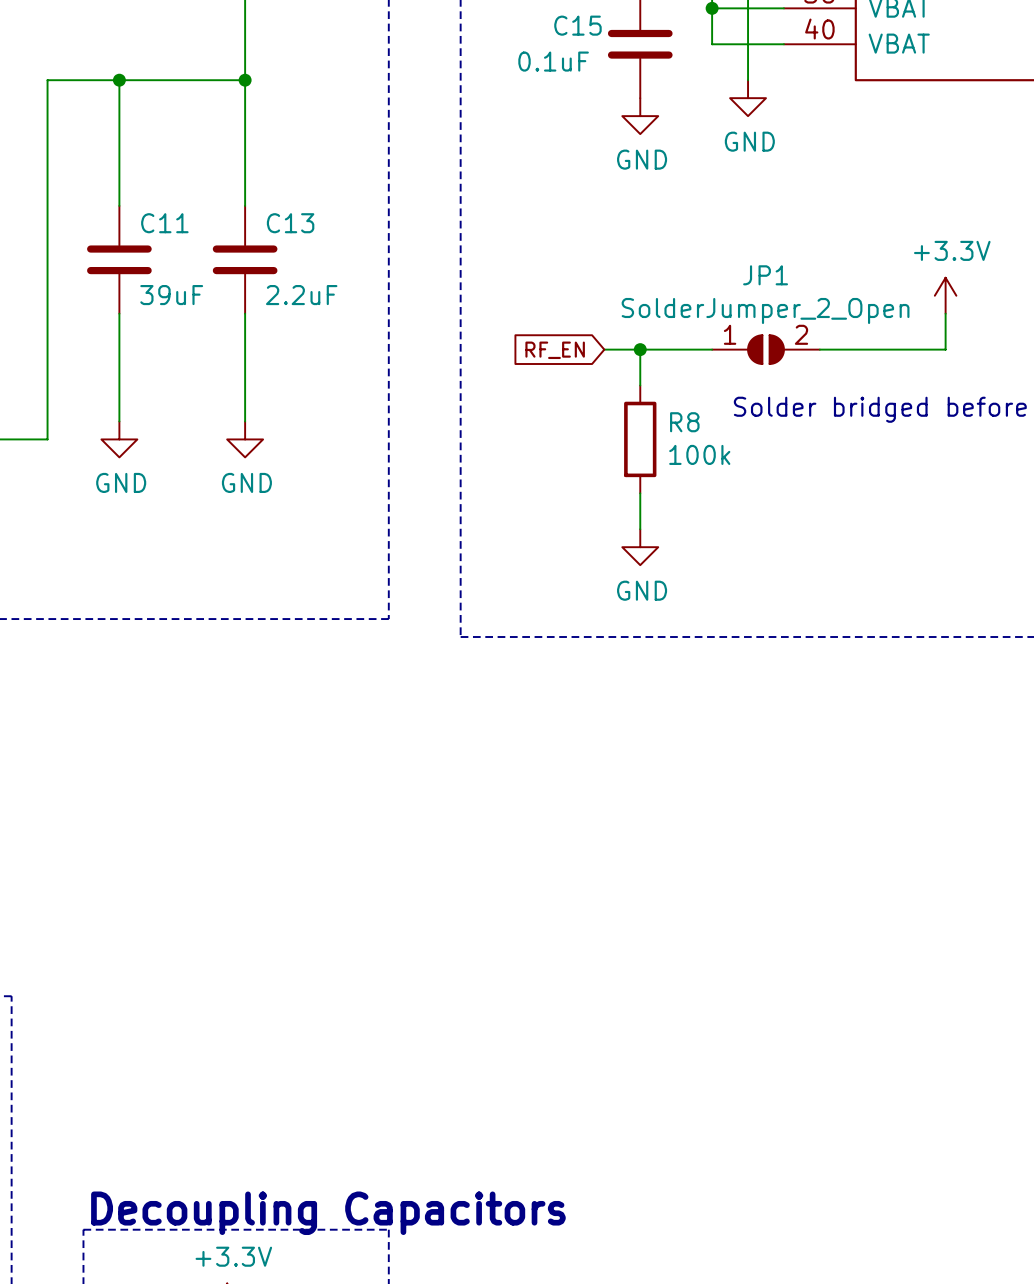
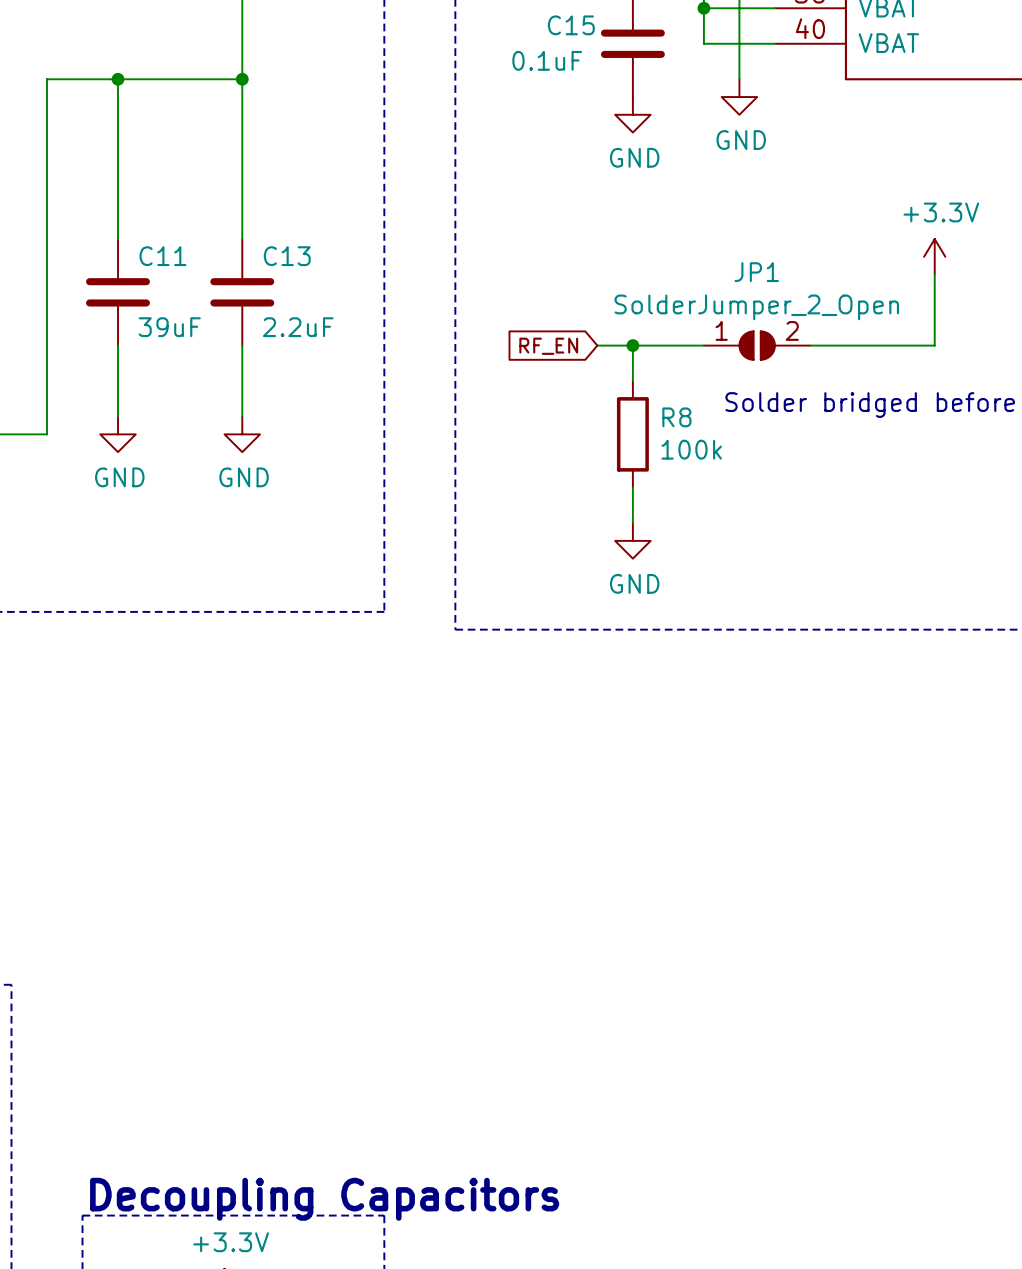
C11 position: (119, 259) -> (118, 292)
C13 position: (245, 259) -> (242, 292)
power symbol position: +3.3V (945, 295) -> +3.3V (934, 256)

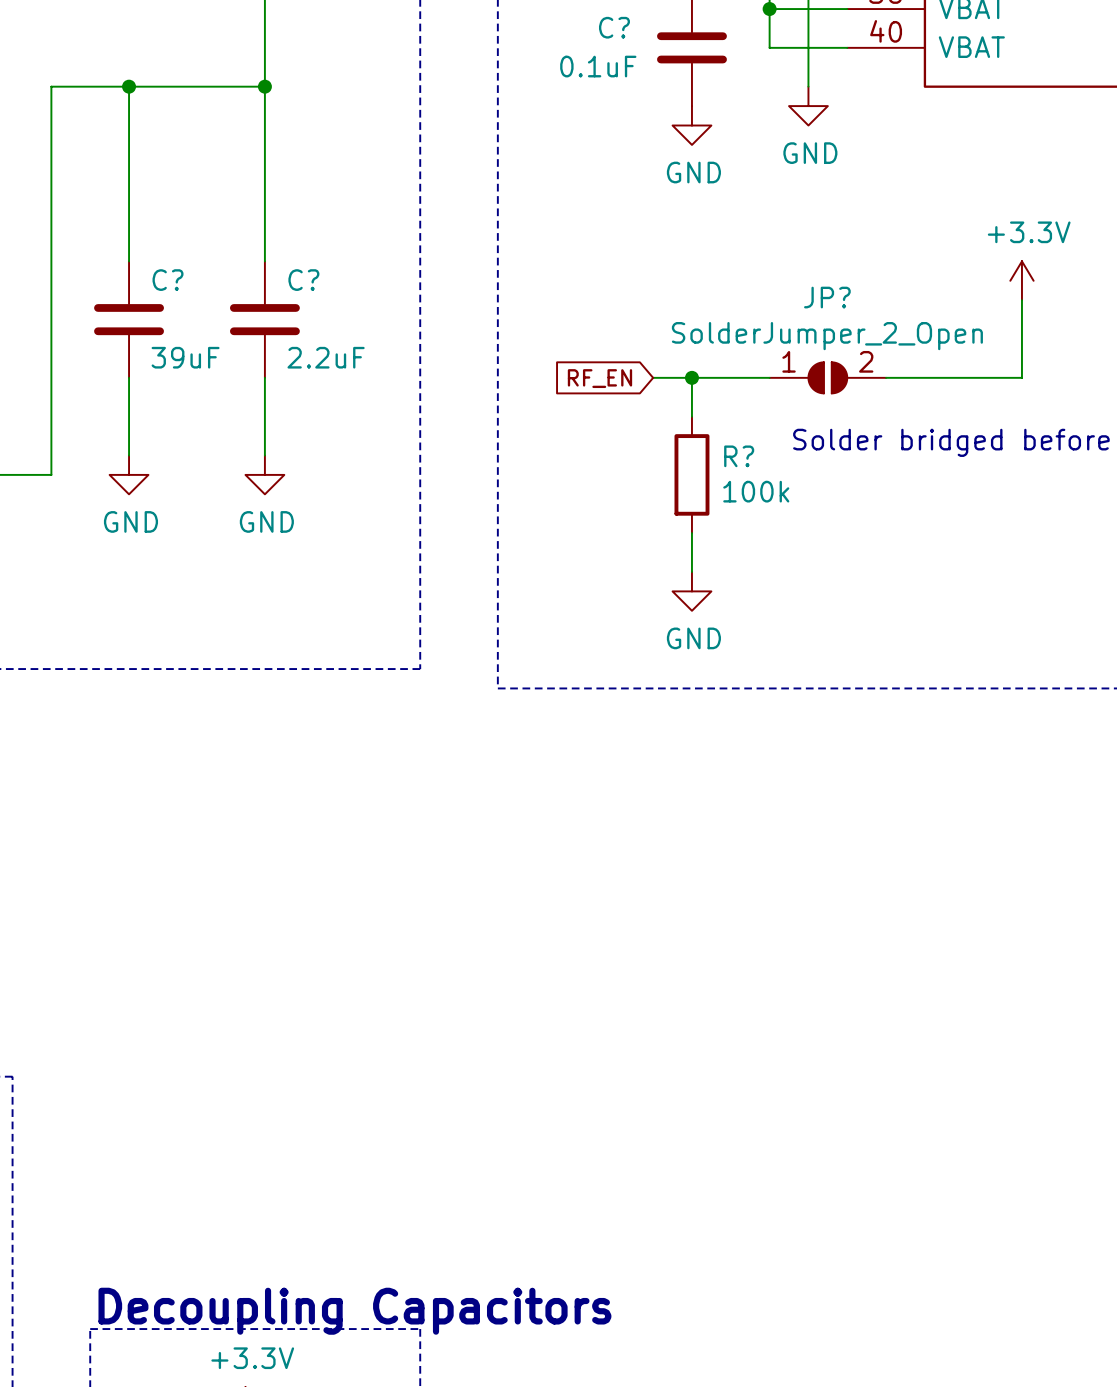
C15 name: C15 (571, 25) -> C? (614, 27)
C11 name: C11 (162, 256) -> C? (168, 280)
C13 name: C13 (287, 256) -> C? (303, 280)
JP1 name: JP1 (756, 272) -> JP? (827, 297)
R8 name: R8 (676, 417) -> R? (739, 456)

